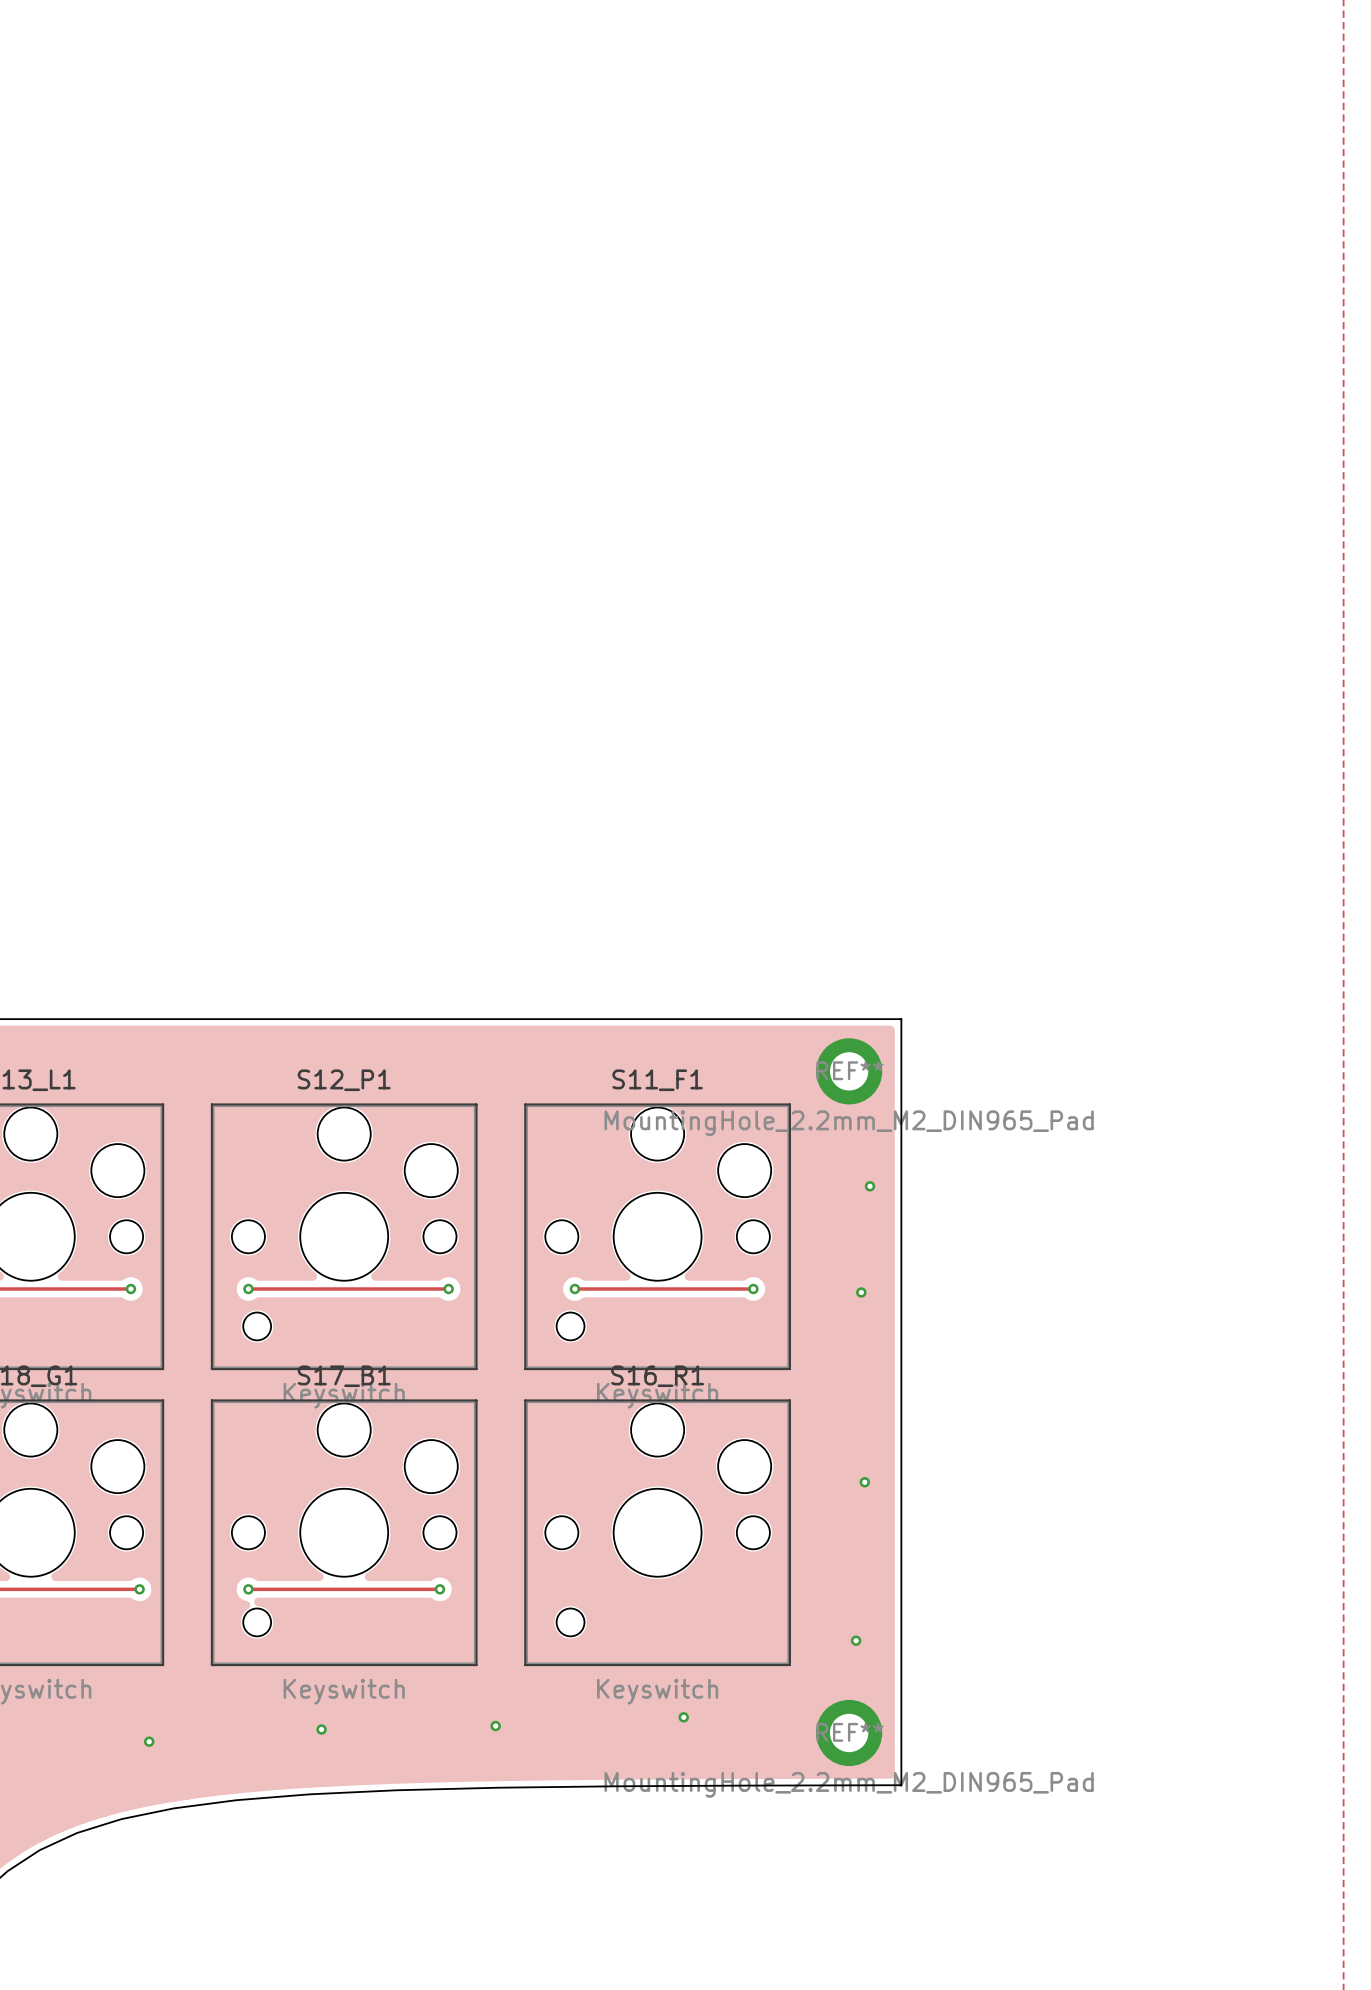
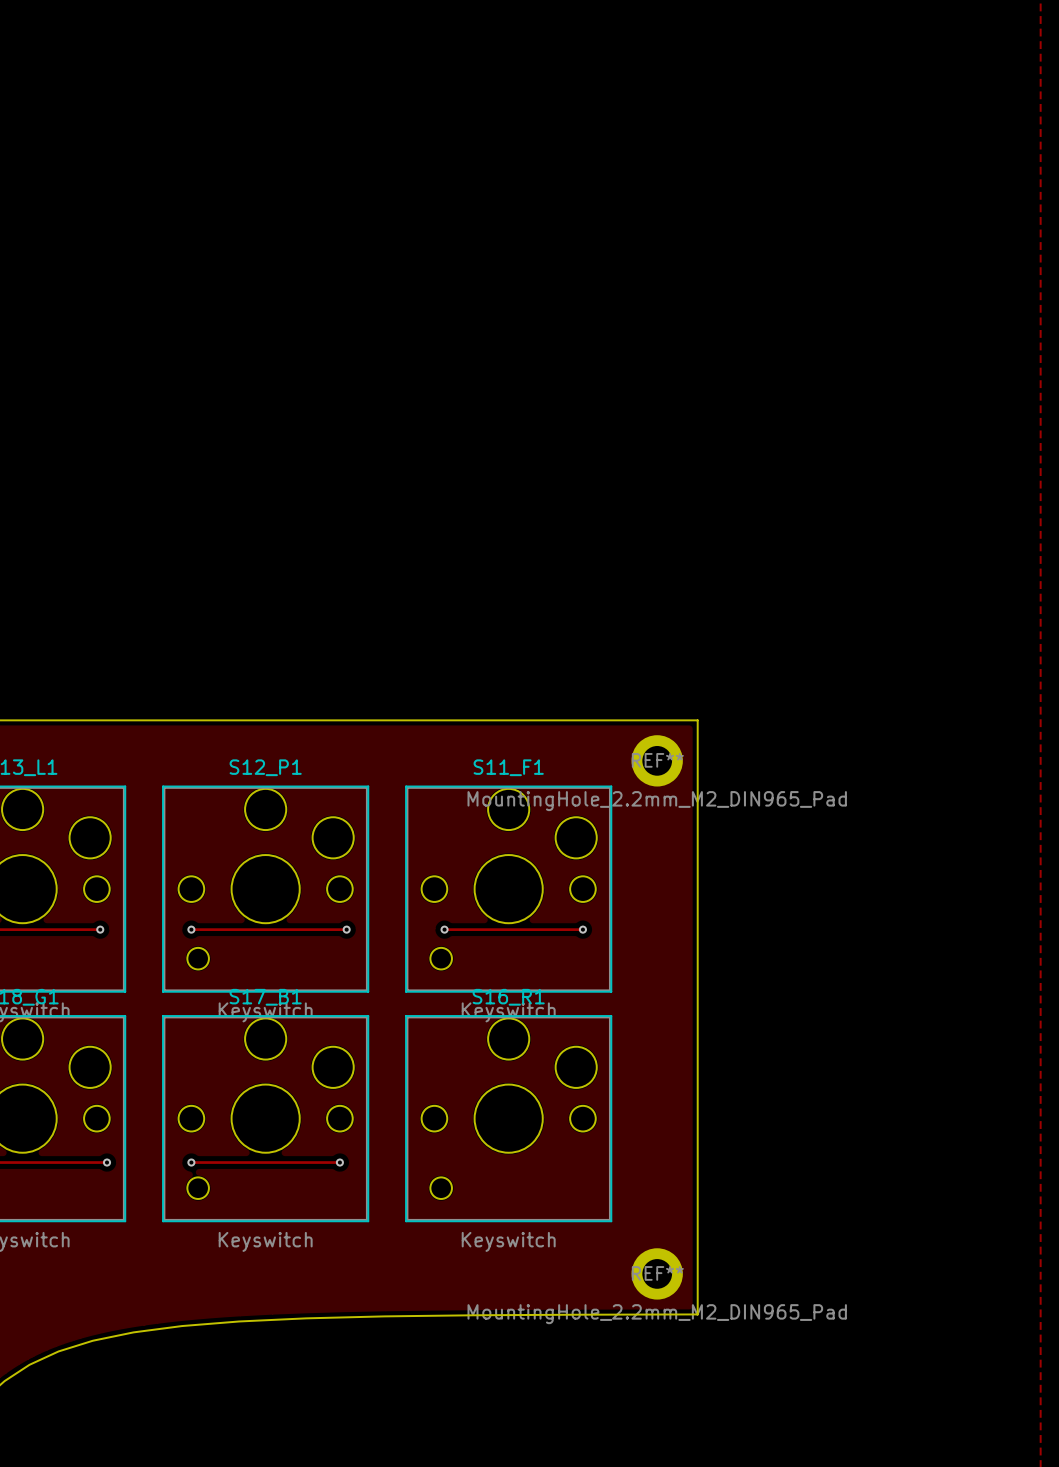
via: (870, 1186) -> none
via: (861, 1292) -> none
via: (864, 1482) -> none
via: (856, 1640) -> none
via: (683, 1717) -> none
via: (495, 1726) -> none
via: (321, 1729) -> none
via: (149, 1741) -> none

